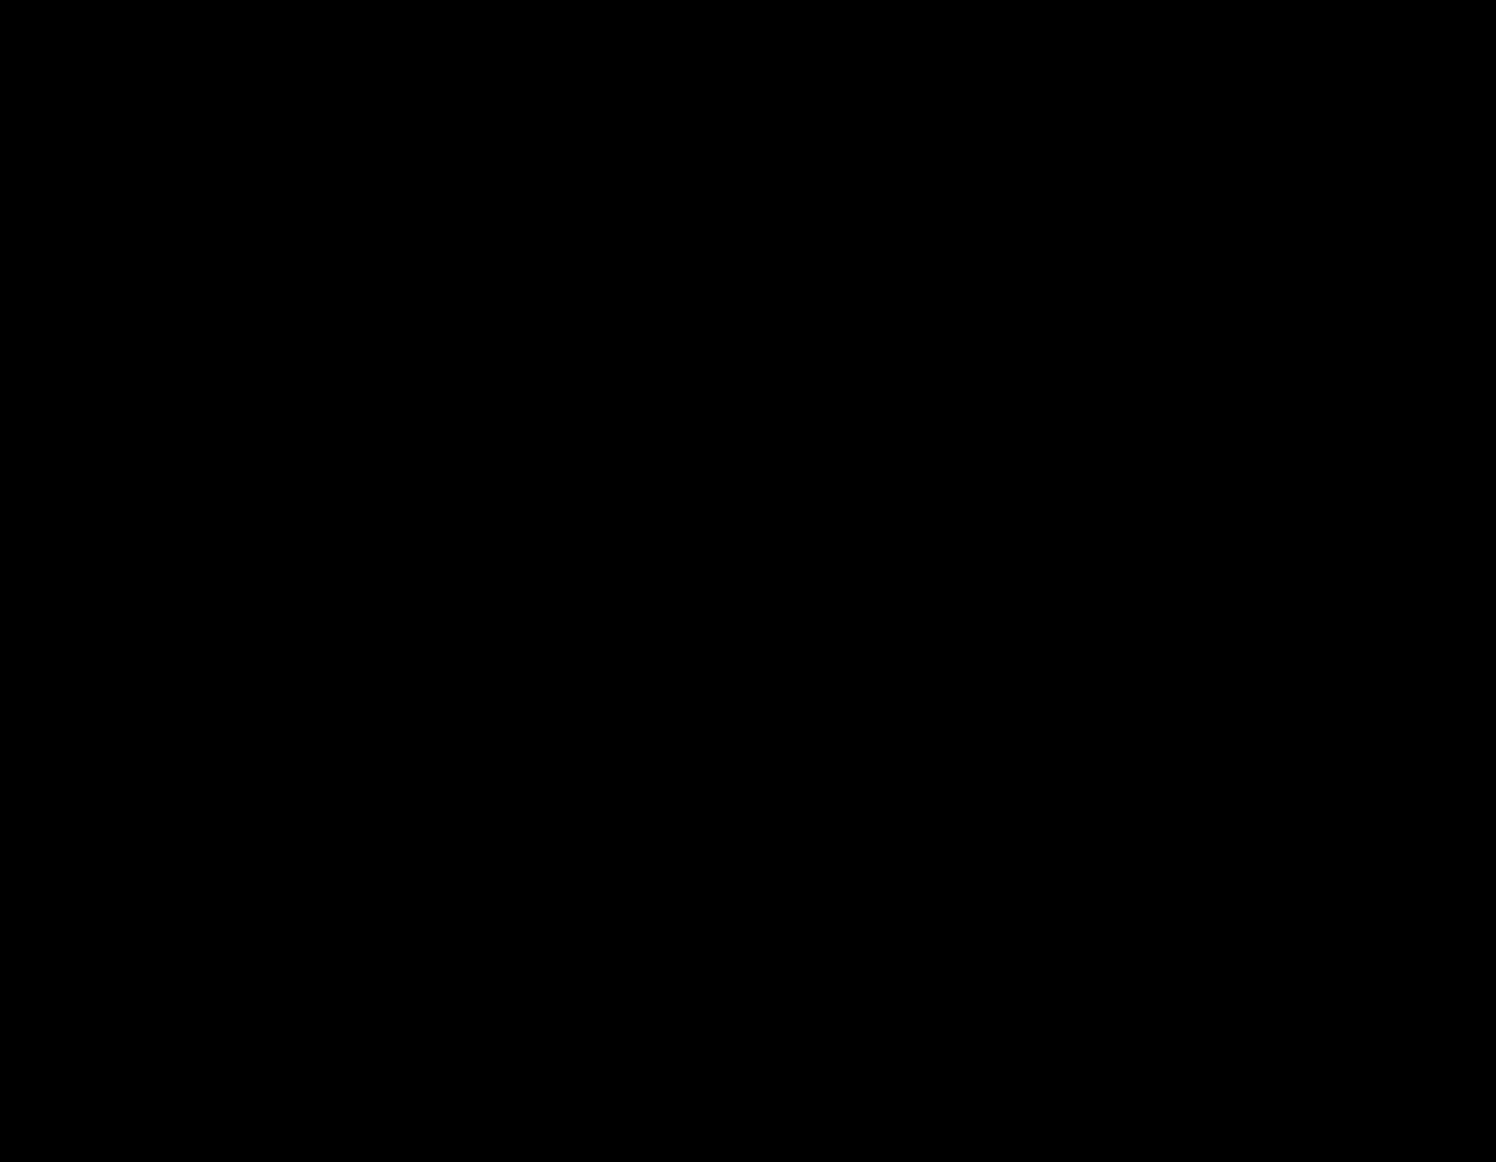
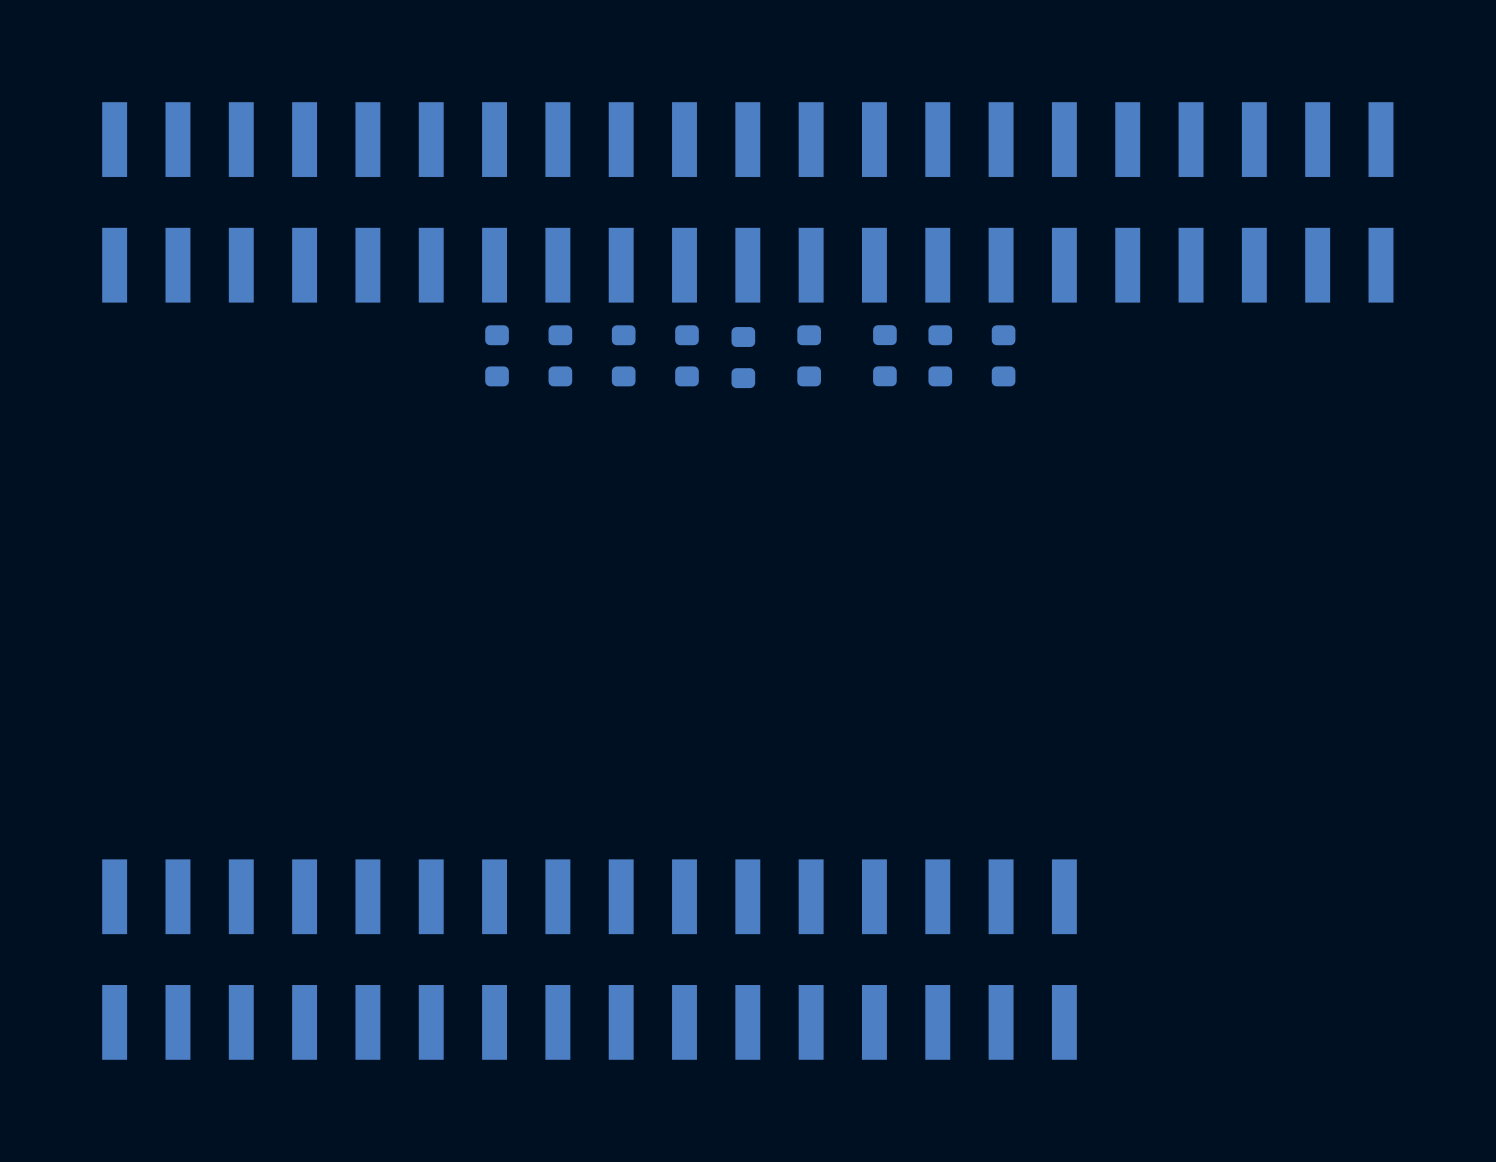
part: none -> (747, 202)
part: none -> (497, 355)
part: none -> (560, 355)
part: none -> (623, 355)
part: none -> (686, 355)
part: none -> (809, 355)
part: none -> (884, 355)
part: none -> (940, 355)
part: none -> (1003, 355)
part: none -> (743, 357)
part: none -> (589, 959)

